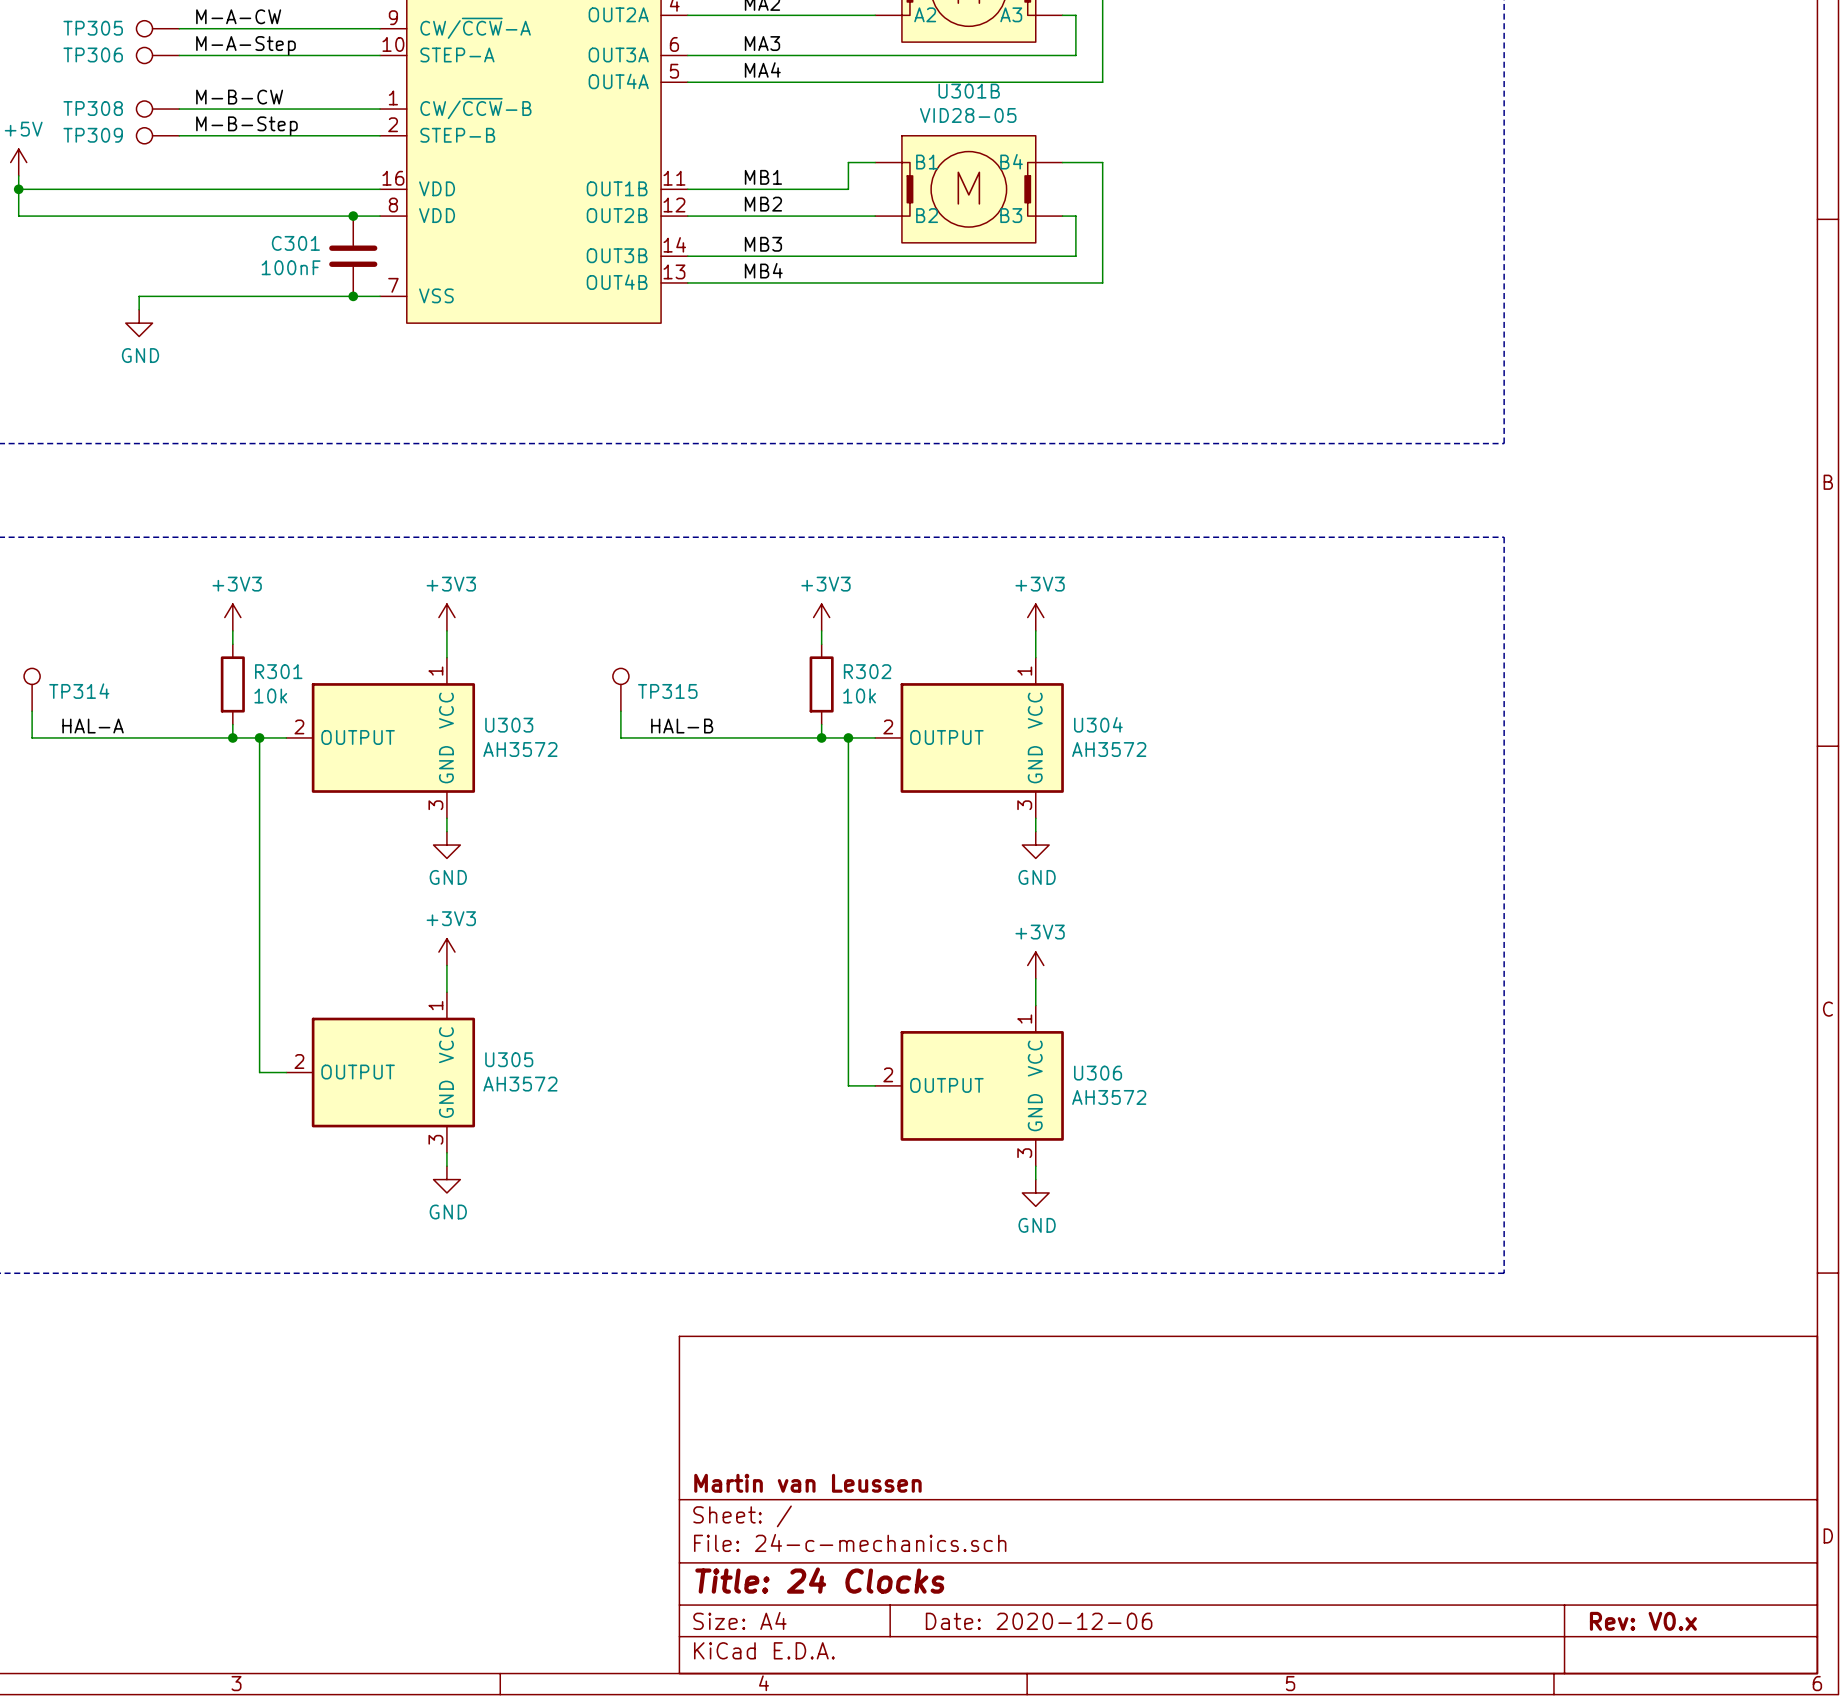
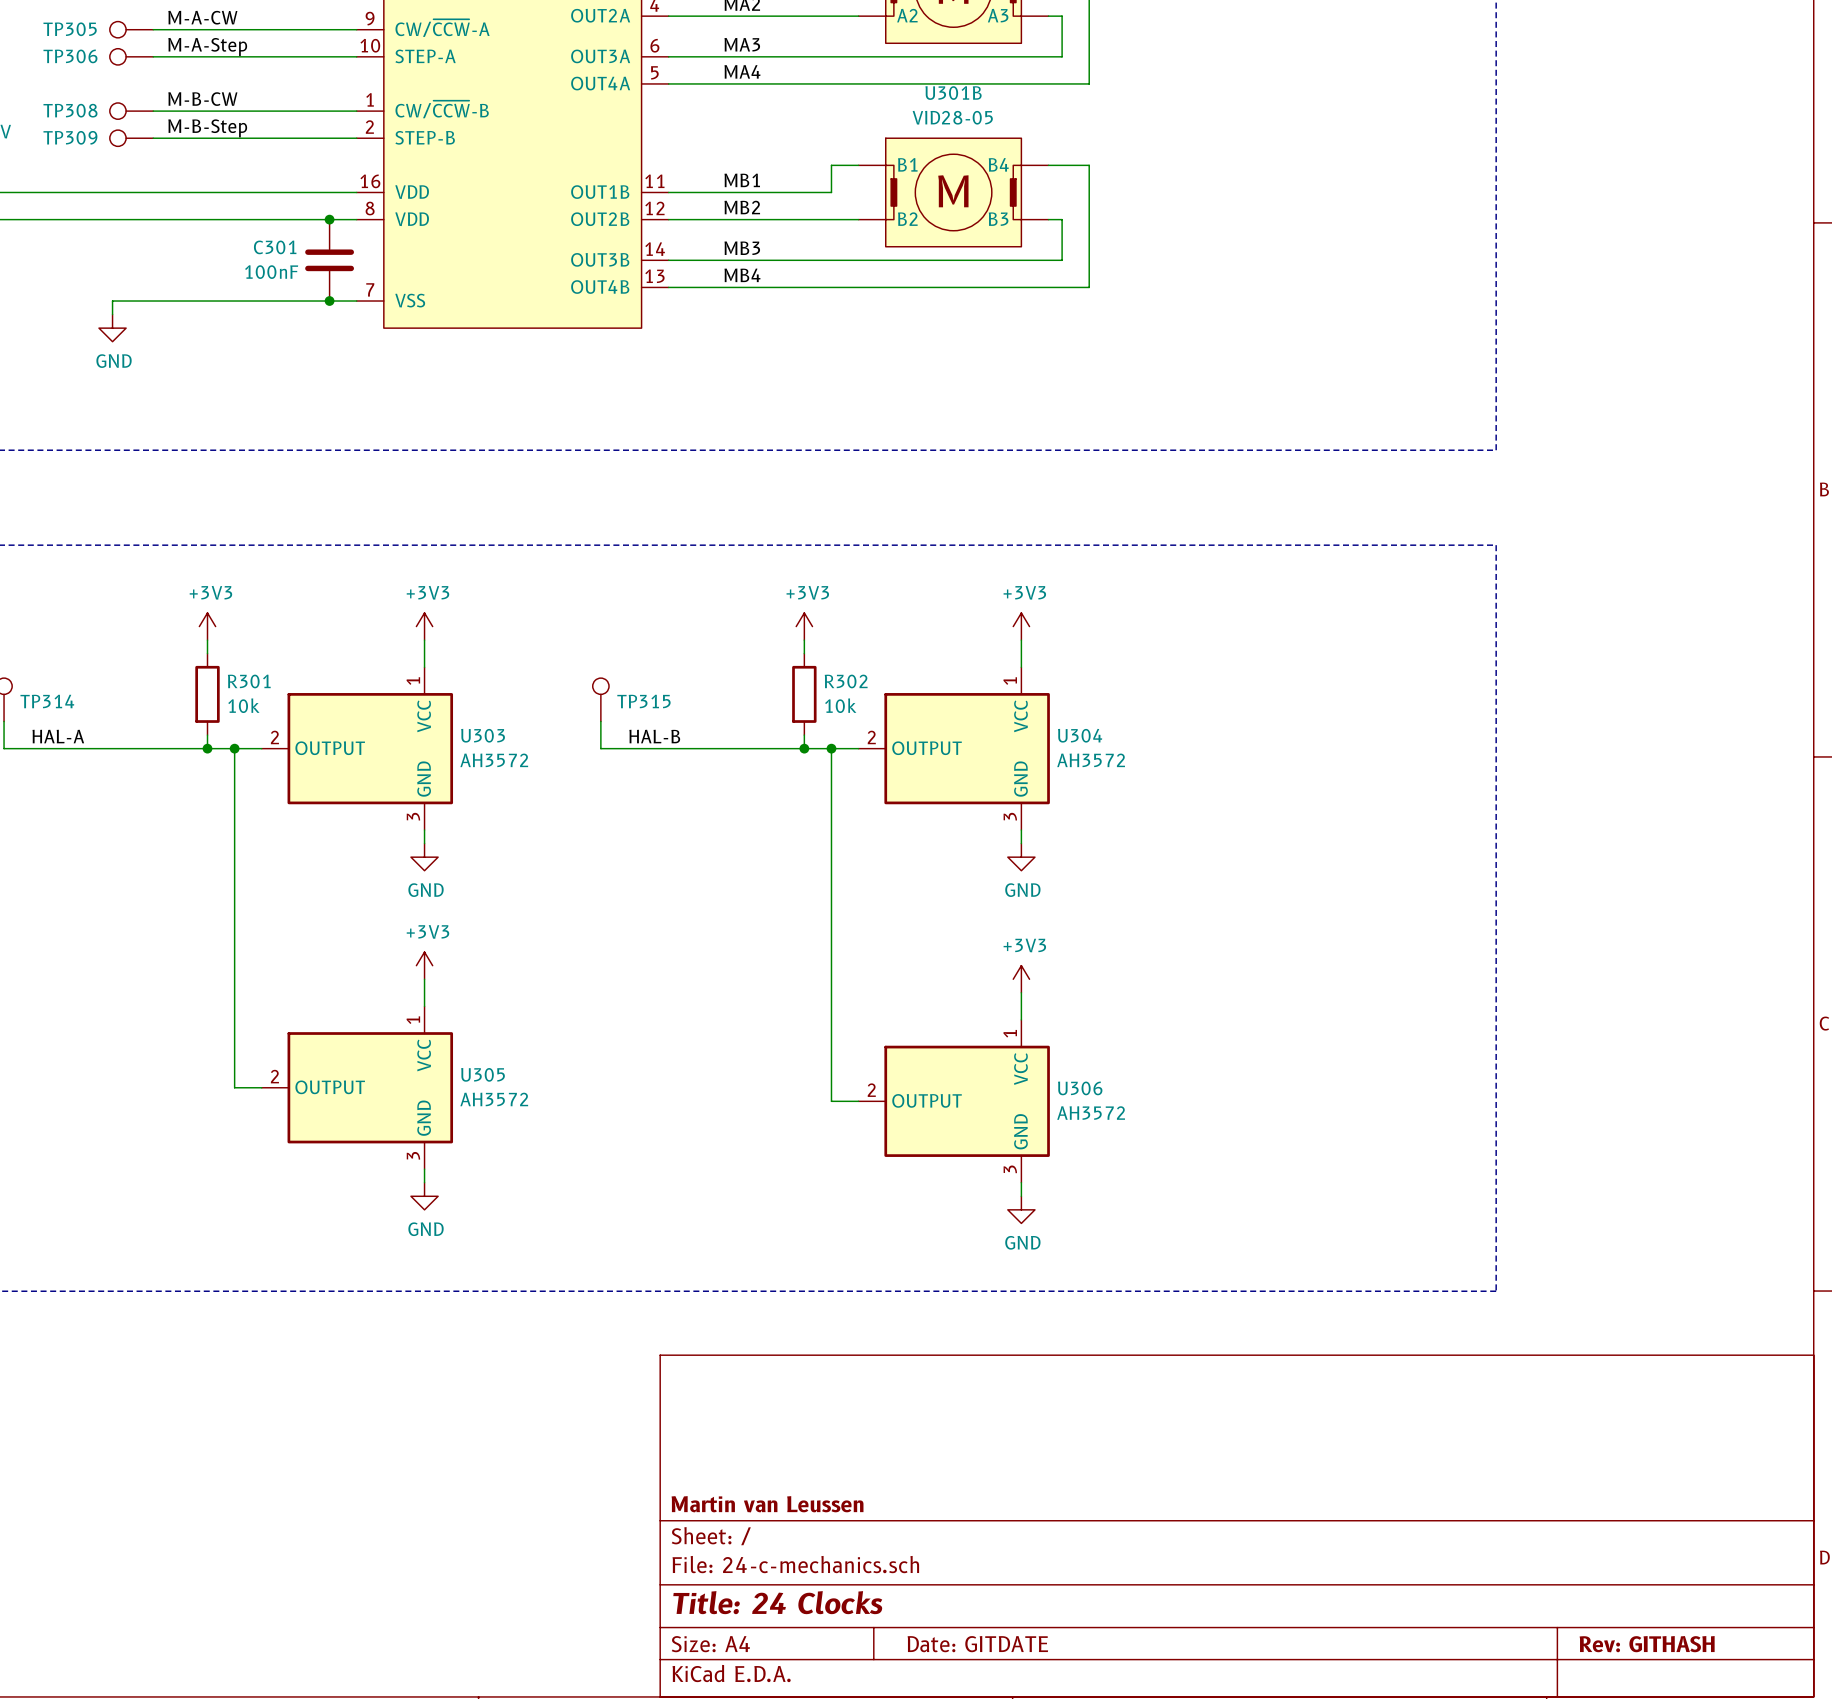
title block: Date: 2020-12-06 (1039, 1621) -> Date: GITDATE (977, 1644)
title block: Rev: V0.x (1643, 1621) -> Rev: GITHASH (1647, 1644)

